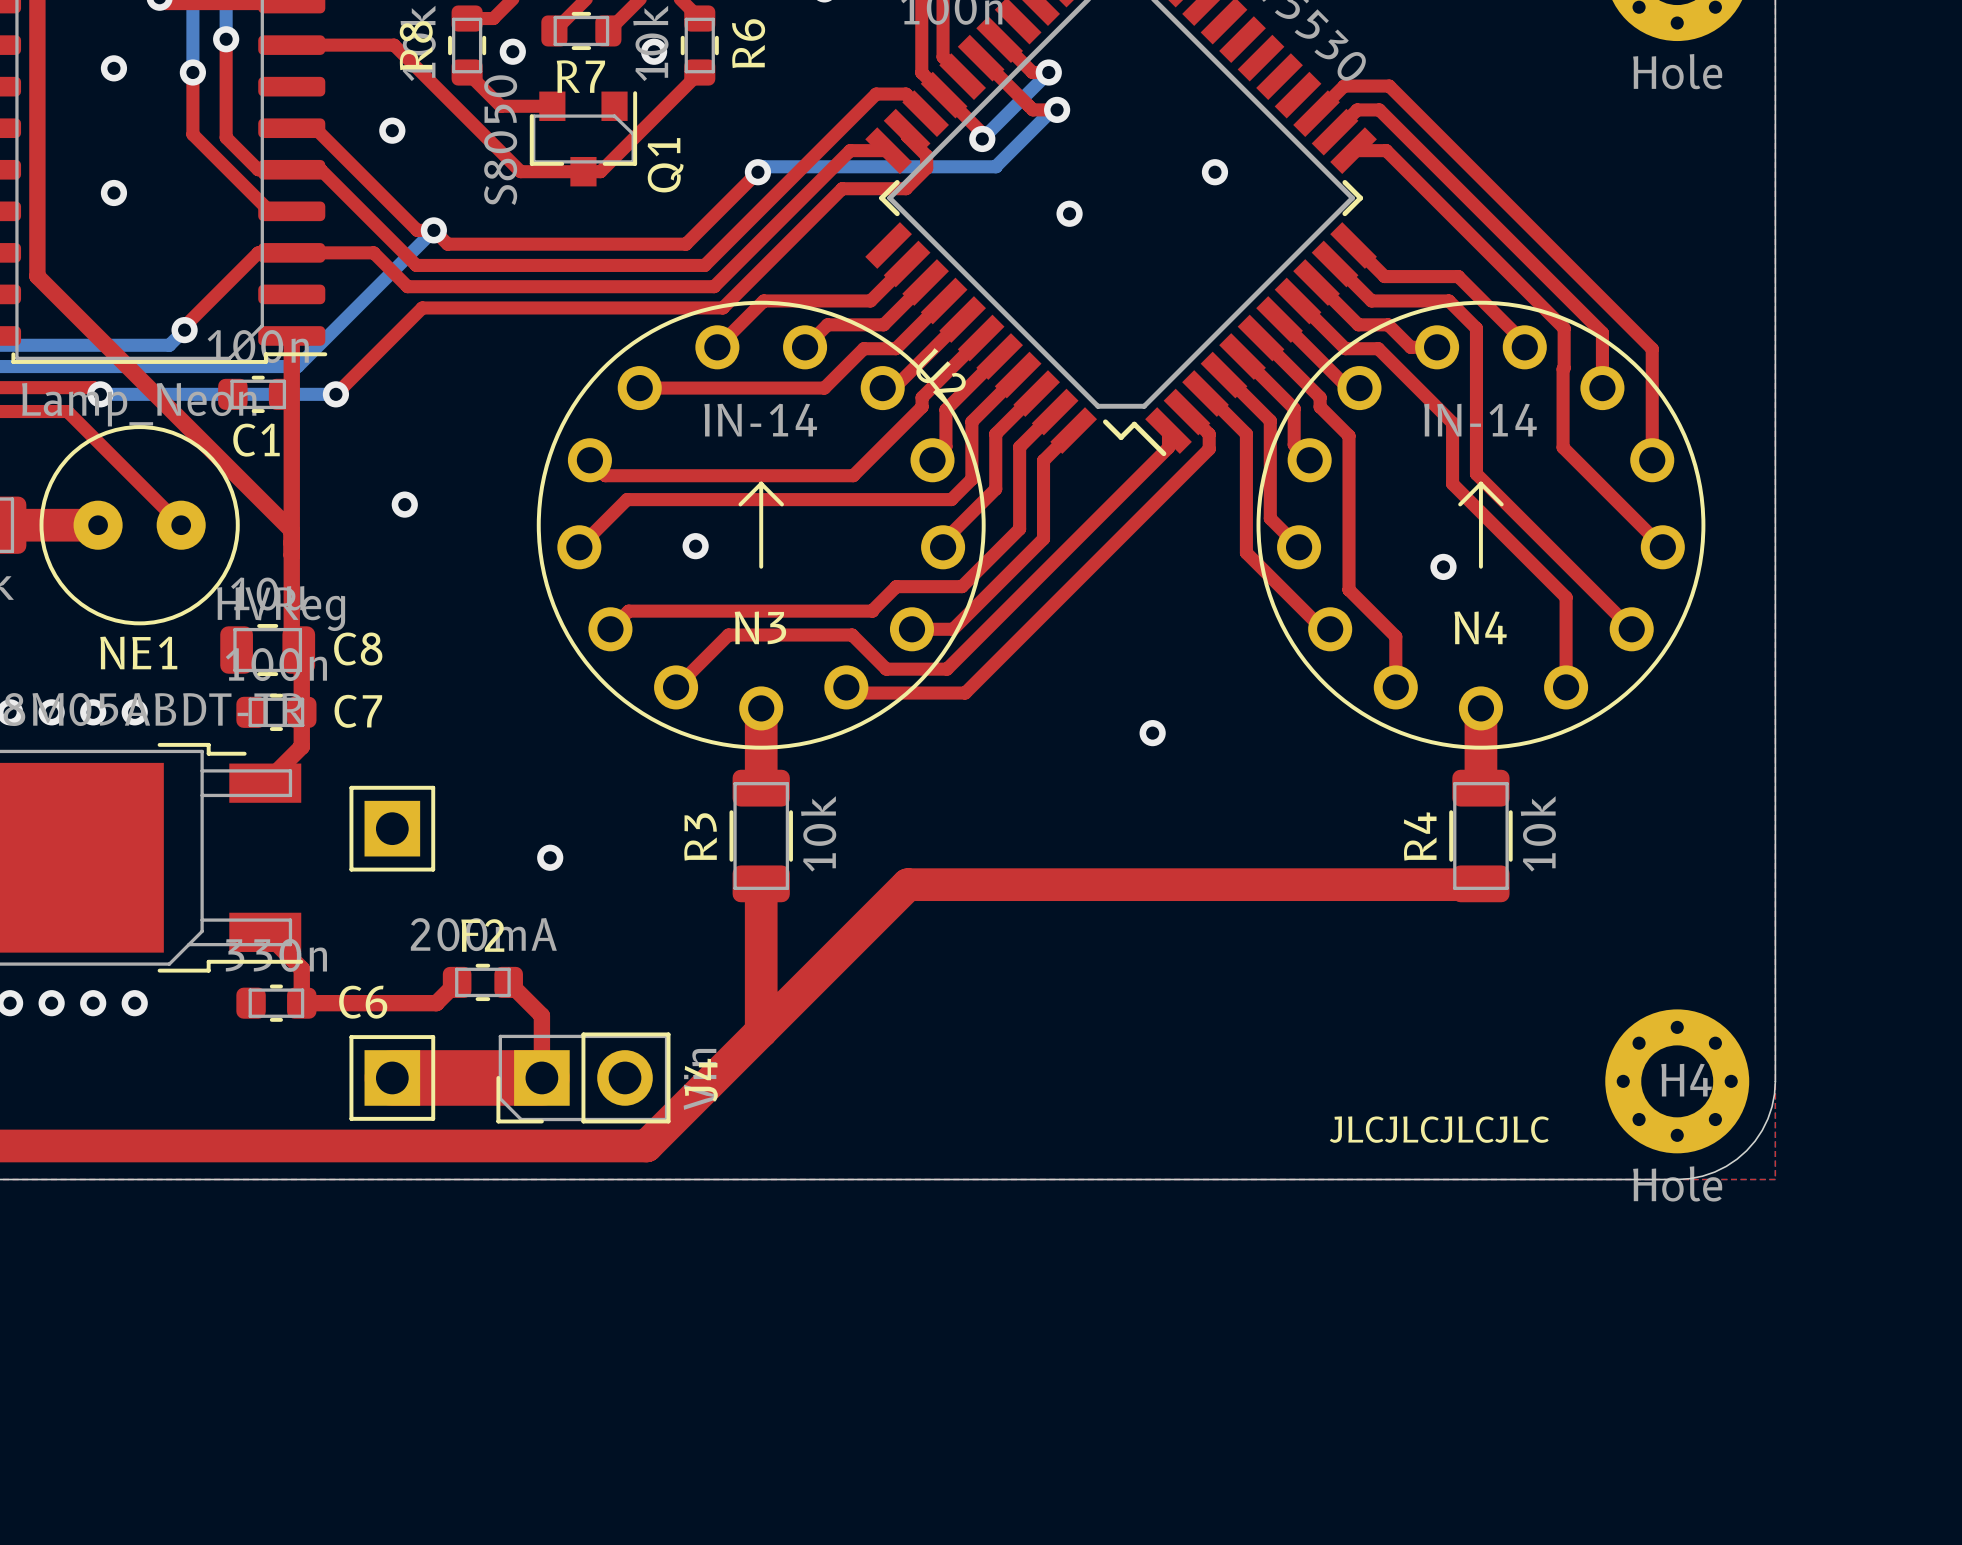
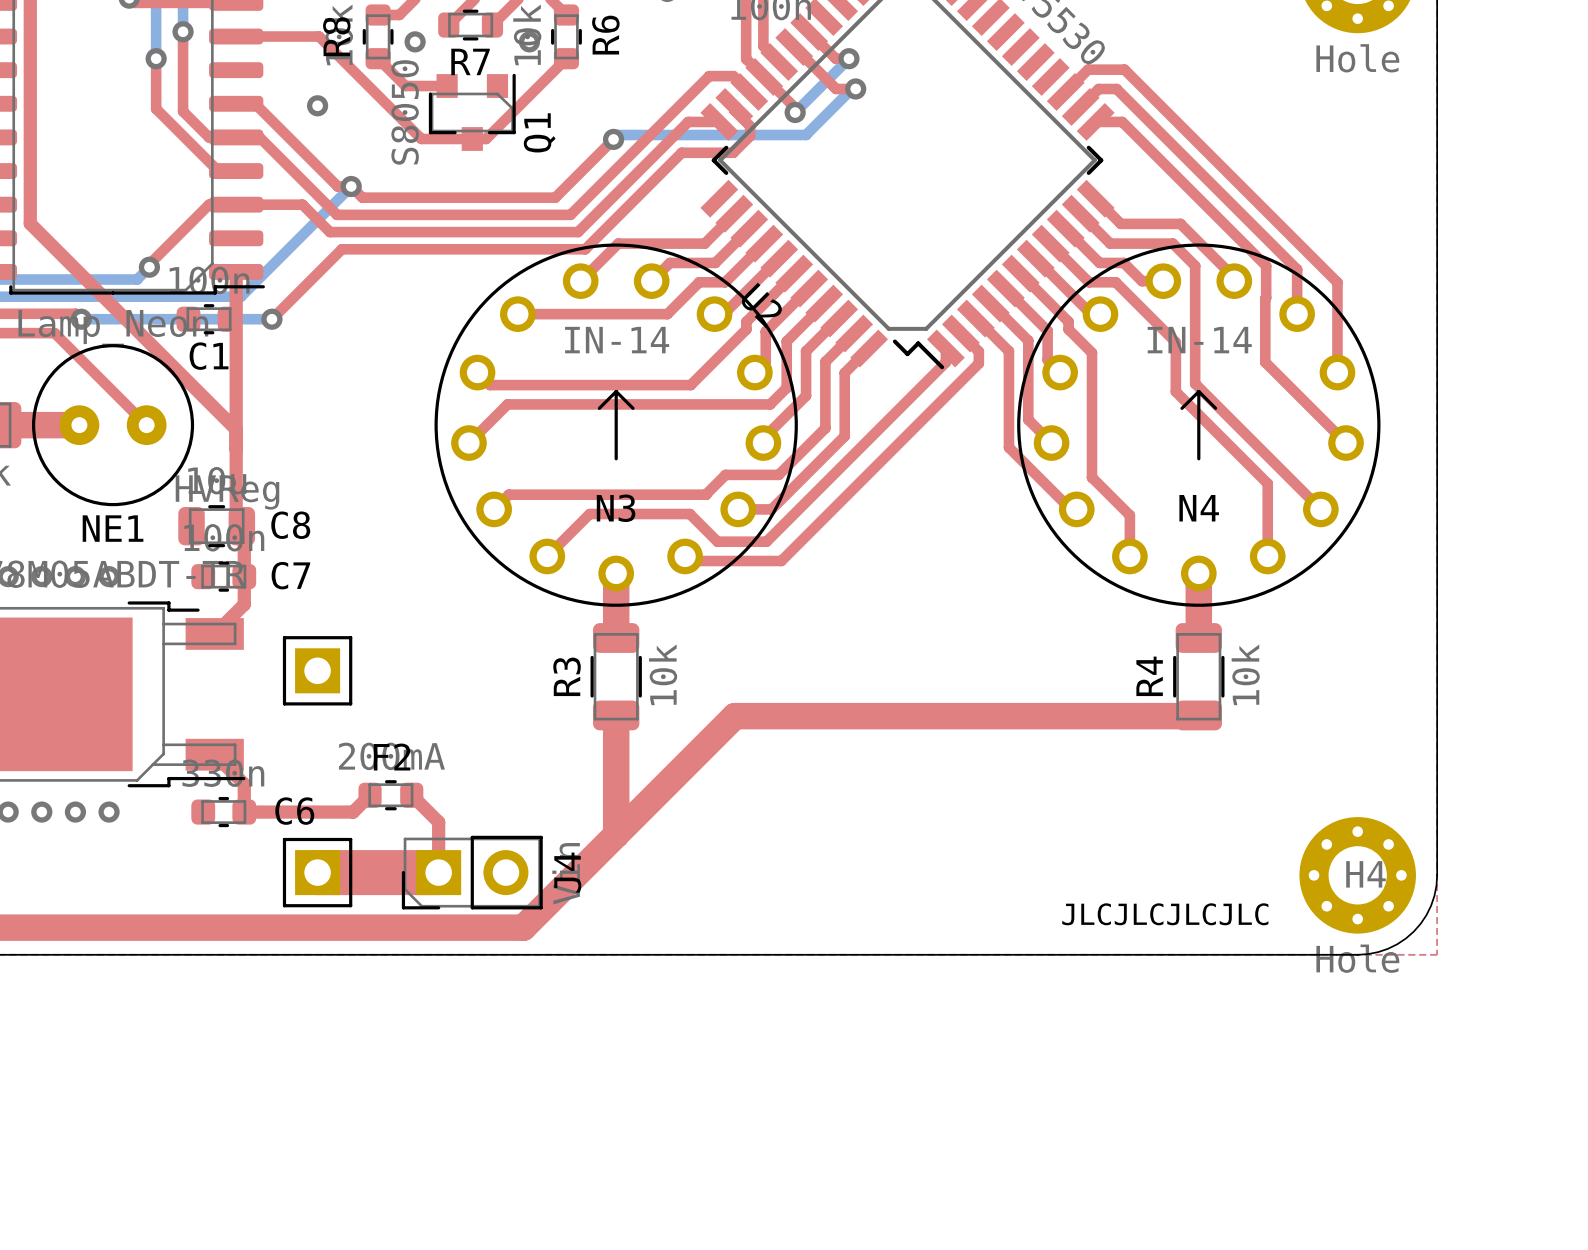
via: (113, 68) -> none
via: (1214, 172) -> none
via: (113, 192) -> none
via: (1069, 213) -> none
via: (404, 504) -> none
via: (695, 546) -> none
via: (1443, 566) -> none
via: (1152, 733) -> none
via: (550, 857) -> none

